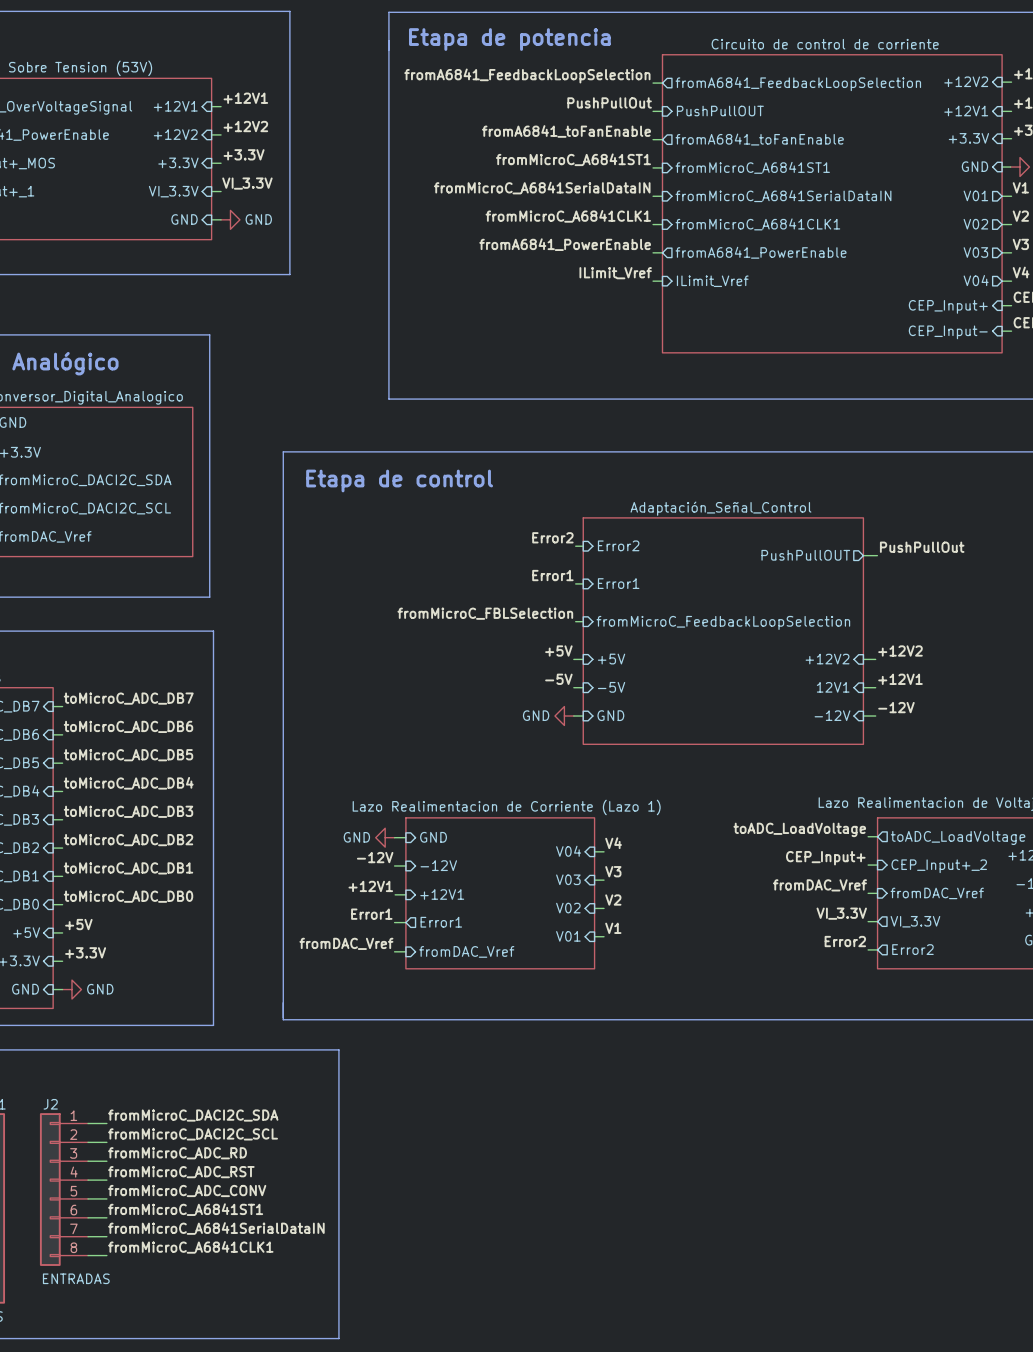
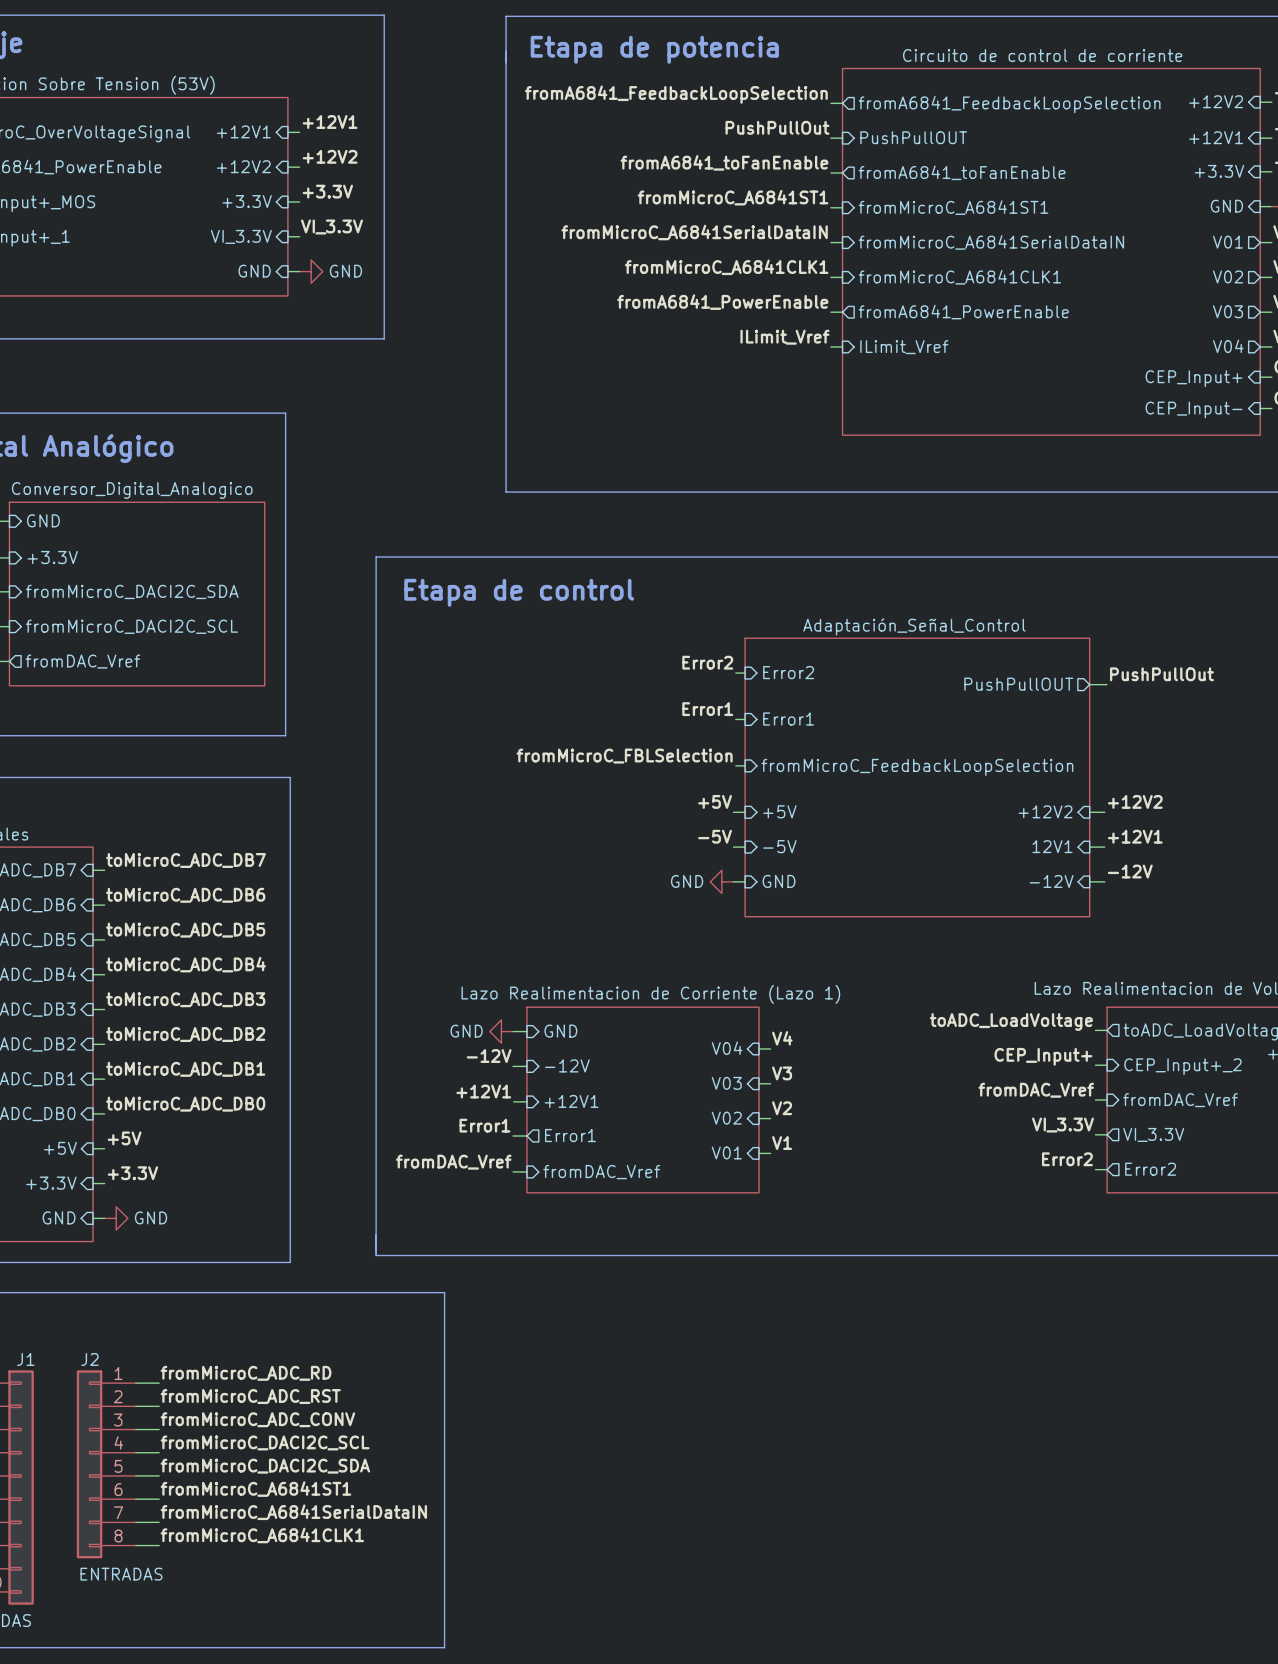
label: fromMicroC_DACI2C_SDA (193, 1115) -> fromMicroC_ADC_RD (246, 1373)
label: fromMicroC_DACI2C_SCL (193, 1134) -> fromMicroC_ADC_RST (250, 1396)
label: fromMicroC_ADC_RD (177, 1153) -> fromMicroC_ADC_CONV (257, 1419)
label: fromMicroC_ADC_RST (181, 1172) -> fromMicroC_DACI2C_SCL (265, 1442)
label: fromMicroC_ADC_CONV (187, 1190) -> fromMicroC_DACI2C_SDA (265, 1466)

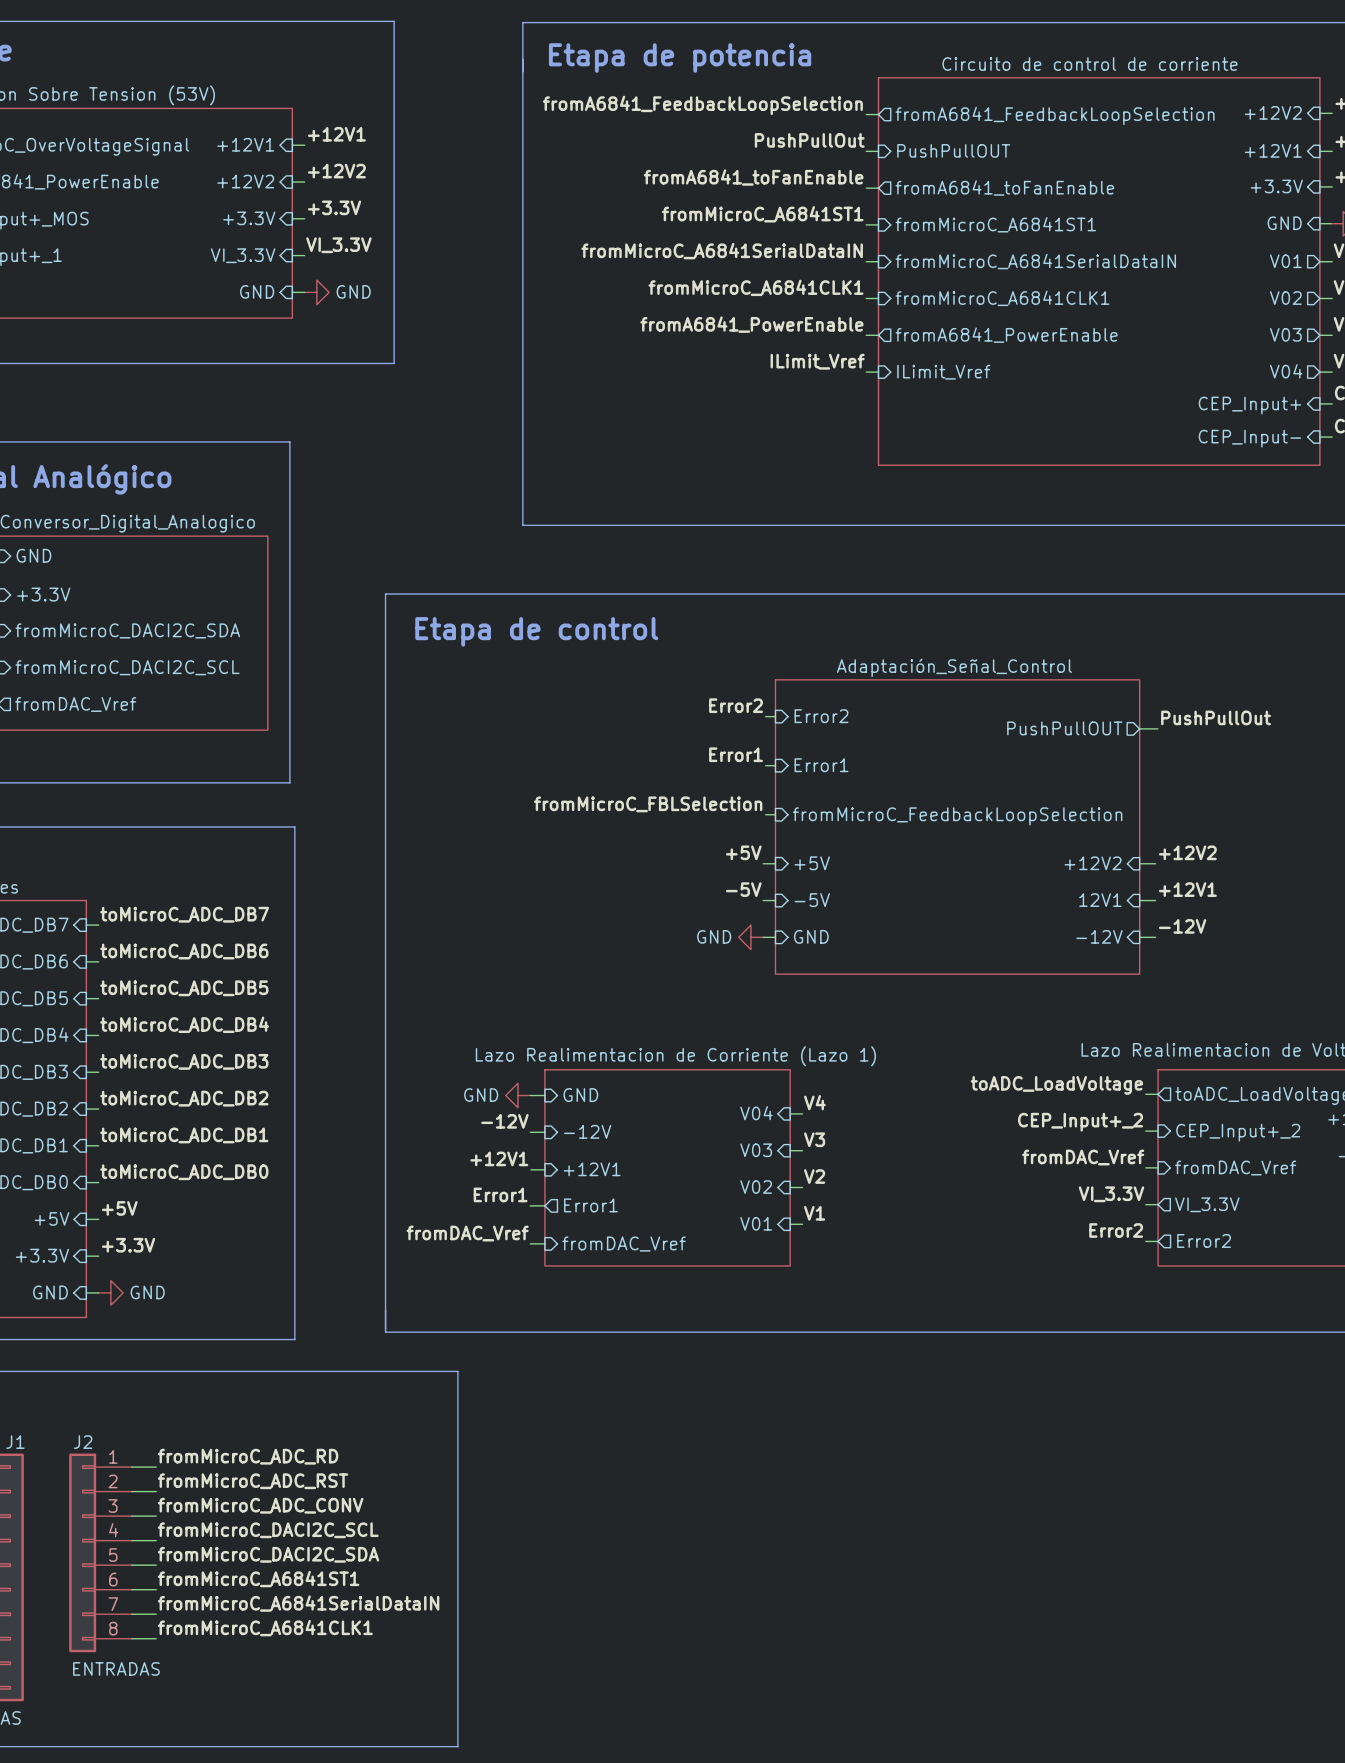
label: CEP_Input+ (1043, 1056) -> CEP_Input+_2 (1080, 1122)

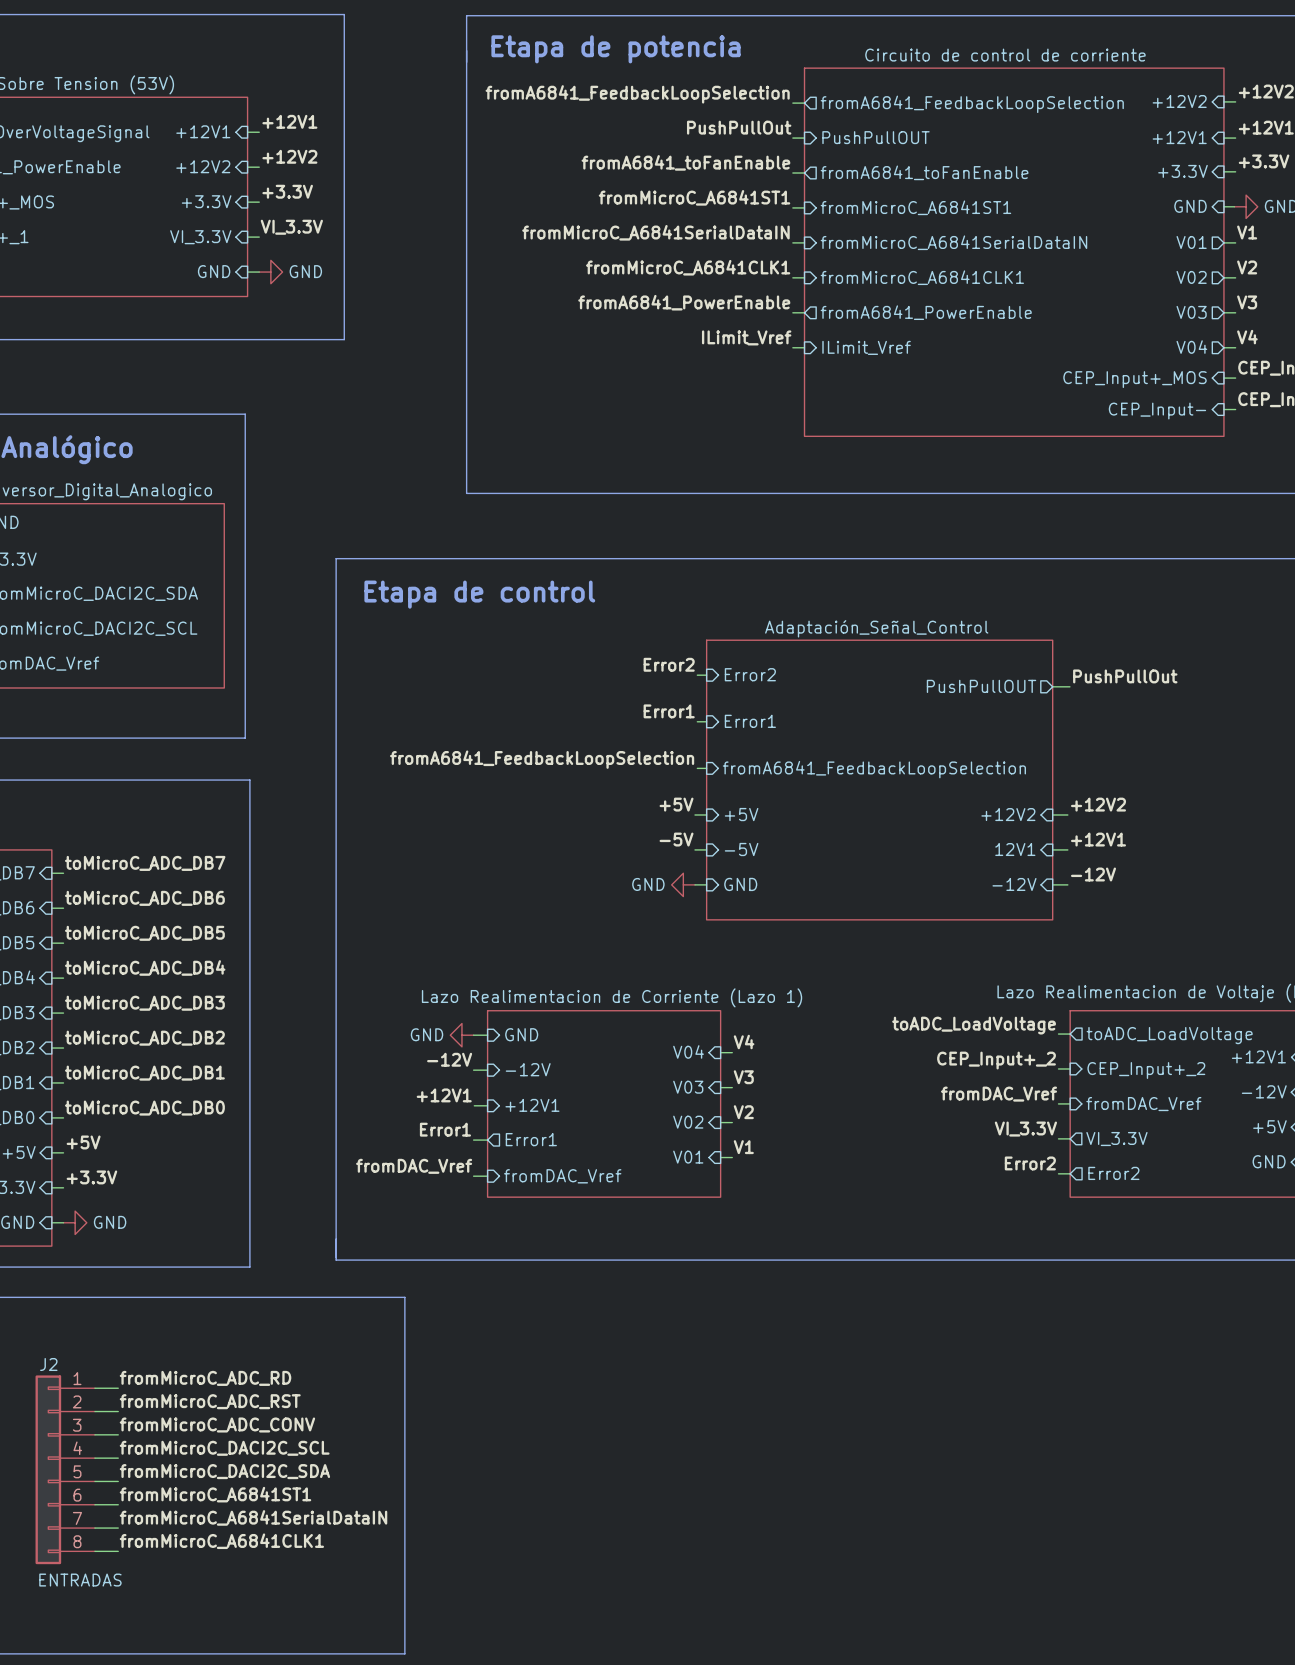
sheet pin: CEP_Input+ (1249, 405) -> CEP_Input+_MOS (1135, 379)
label: fromMicroC_FBLSelection (648, 804) -> fromA6841_FeedbackLoopSelection (542, 759)
sheet pin: fromMicroC_FeedbackLoopSelection (957, 816) -> fromA6841_FeedbackLoopSelection (874, 769)

